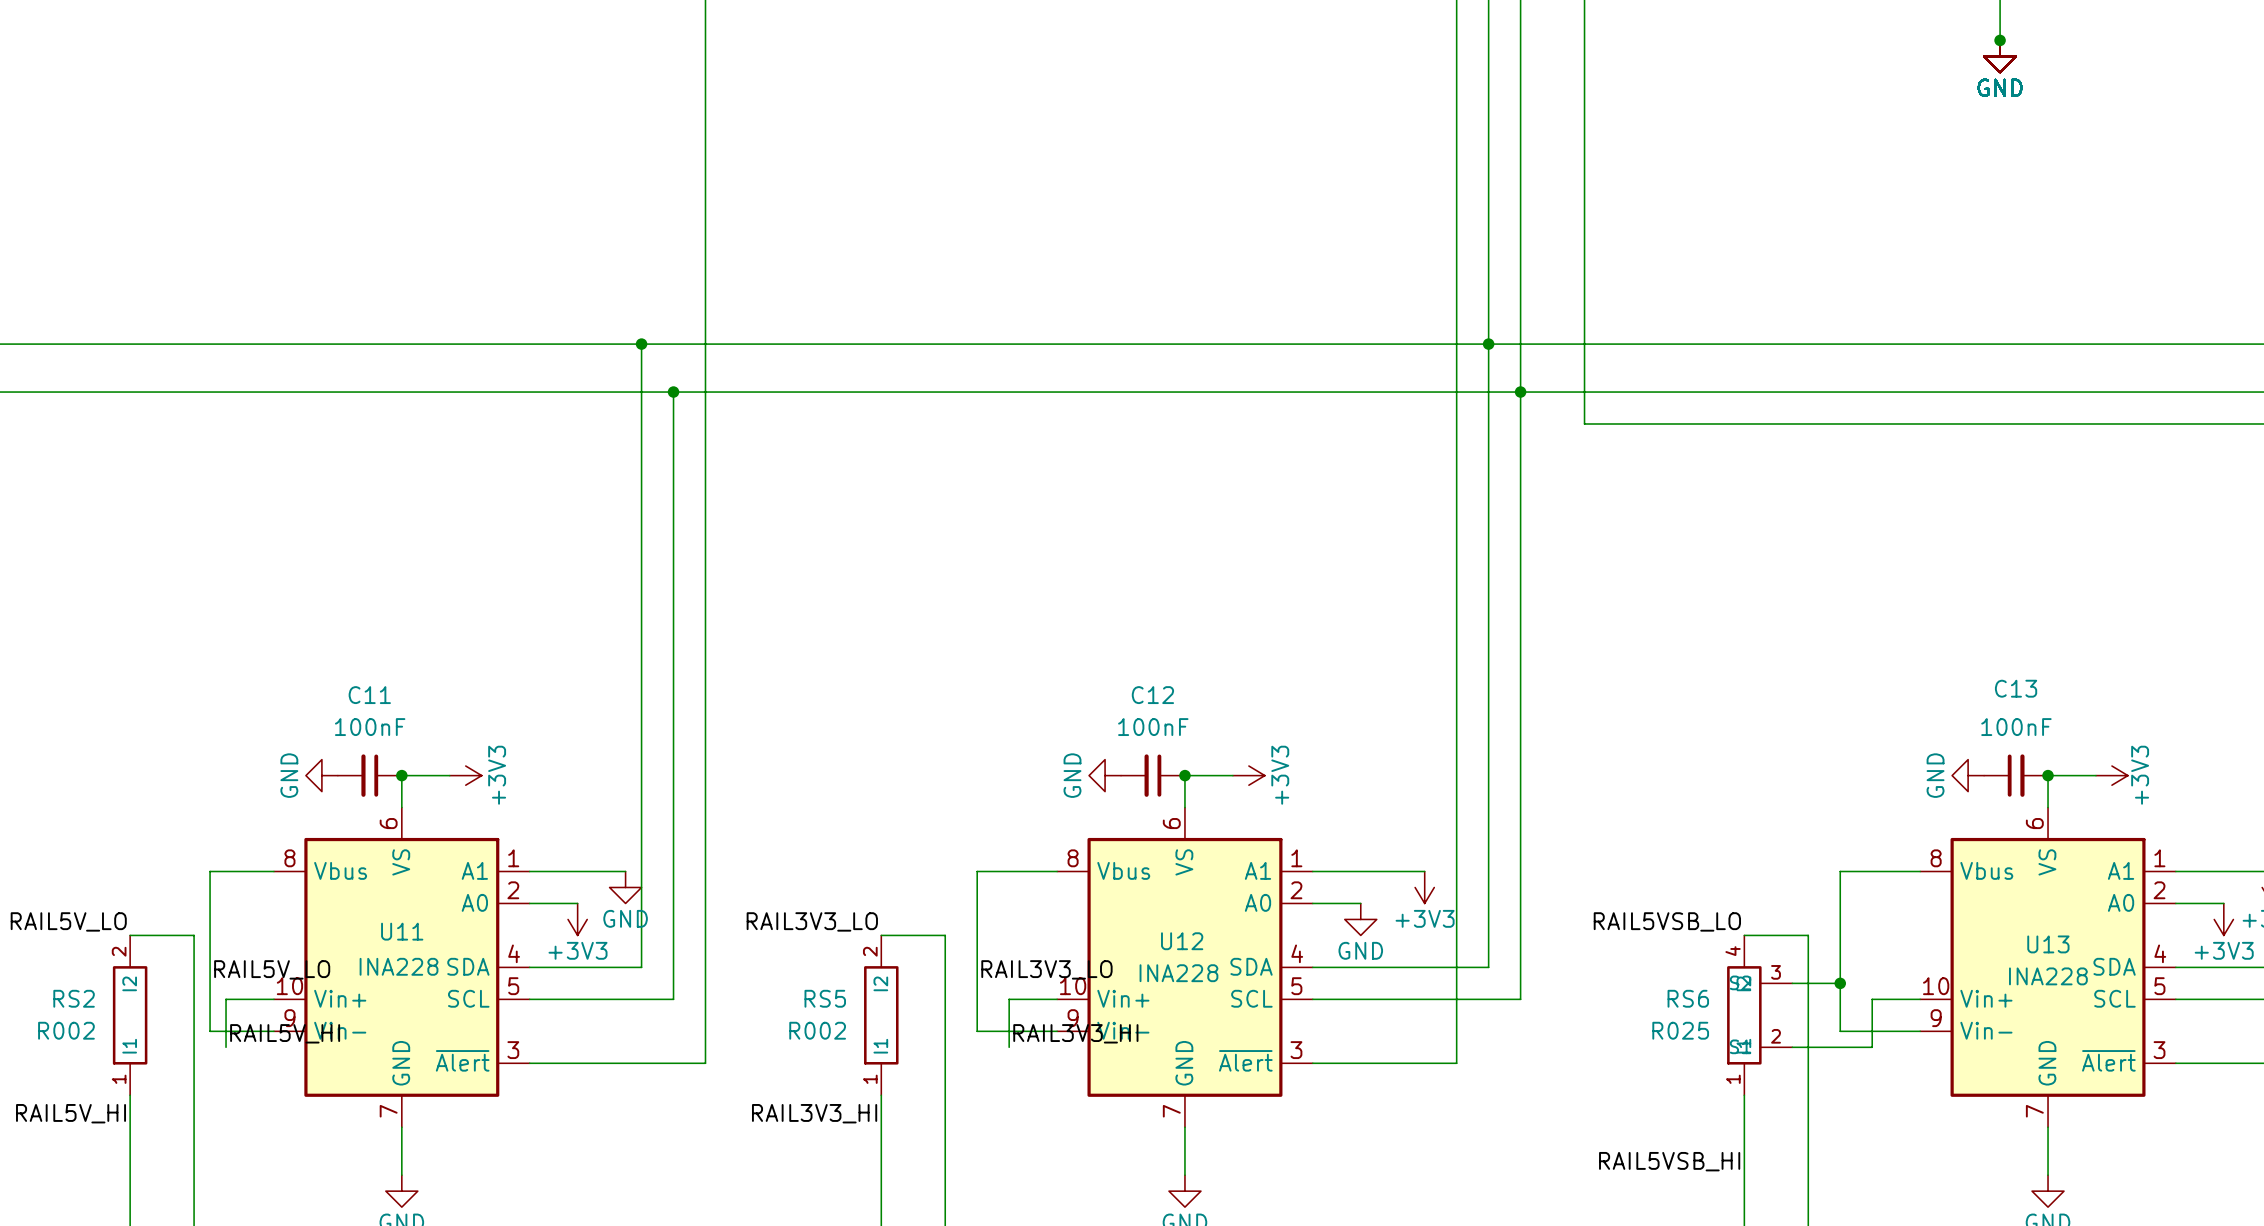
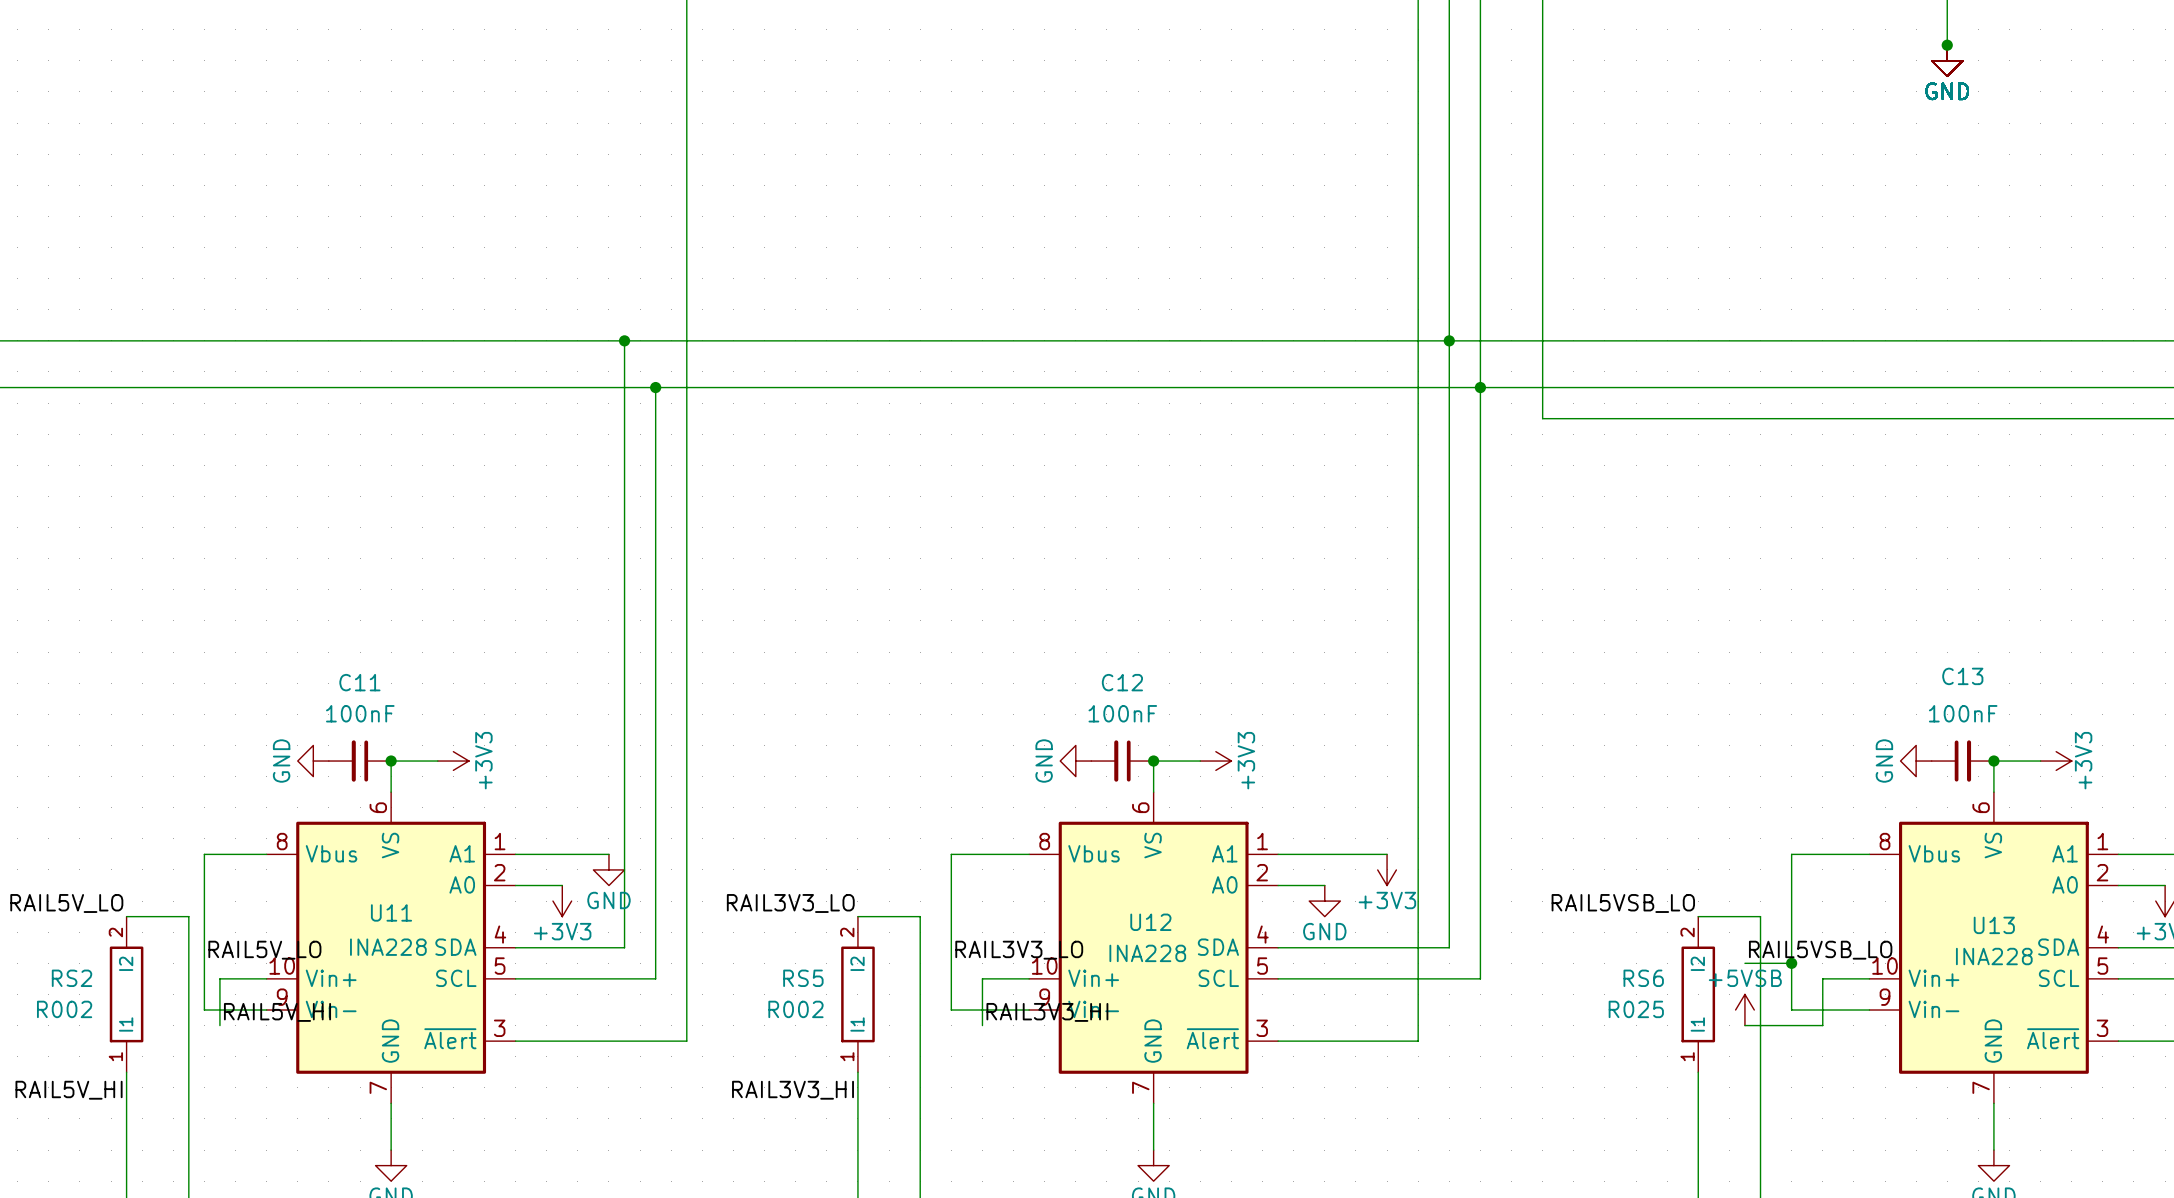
RS6 symbol: [1727, 935, 1793, 1096] -> [1681, 916, 1716, 1073]
label: none -> RAIL5VSB_LO (1820, 950)
power symbol: none -> +5VSB (1744, 1010)
label: RAIL5VSB_HI (1669, 1161) -> none

